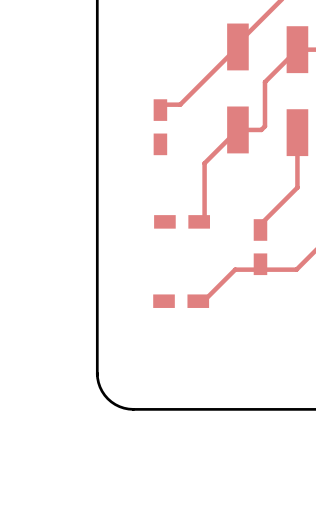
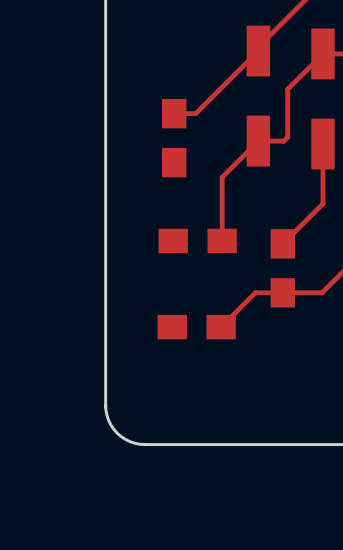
part footprint: [153, 99, 168, 156] -> [161, 98, 187, 178]
part footprint: [154, 215, 210, 229] -> [158, 228, 237, 254]
part footprint: [253, 219, 268, 276] -> [270, 229, 296, 308]
part footprint: [153, 294, 210, 308] -> [157, 314, 236, 340]

